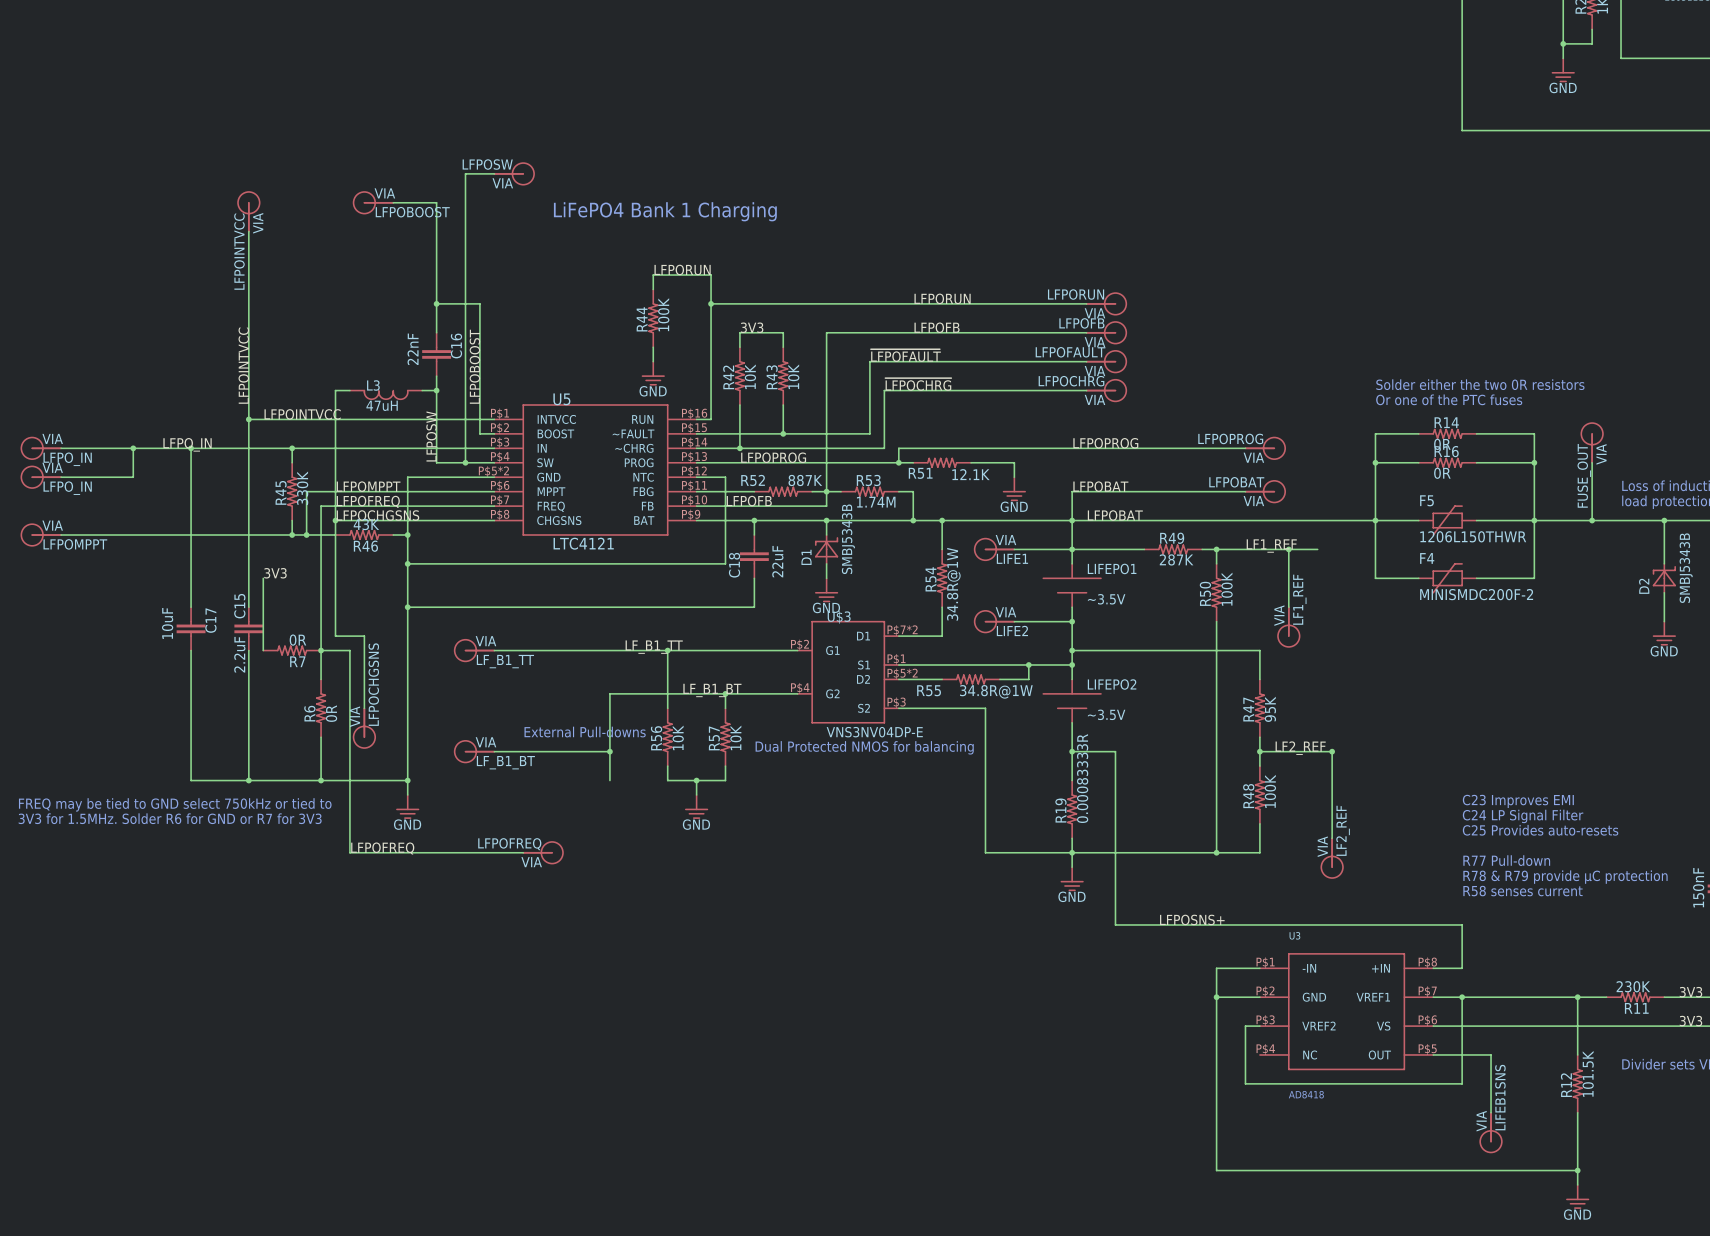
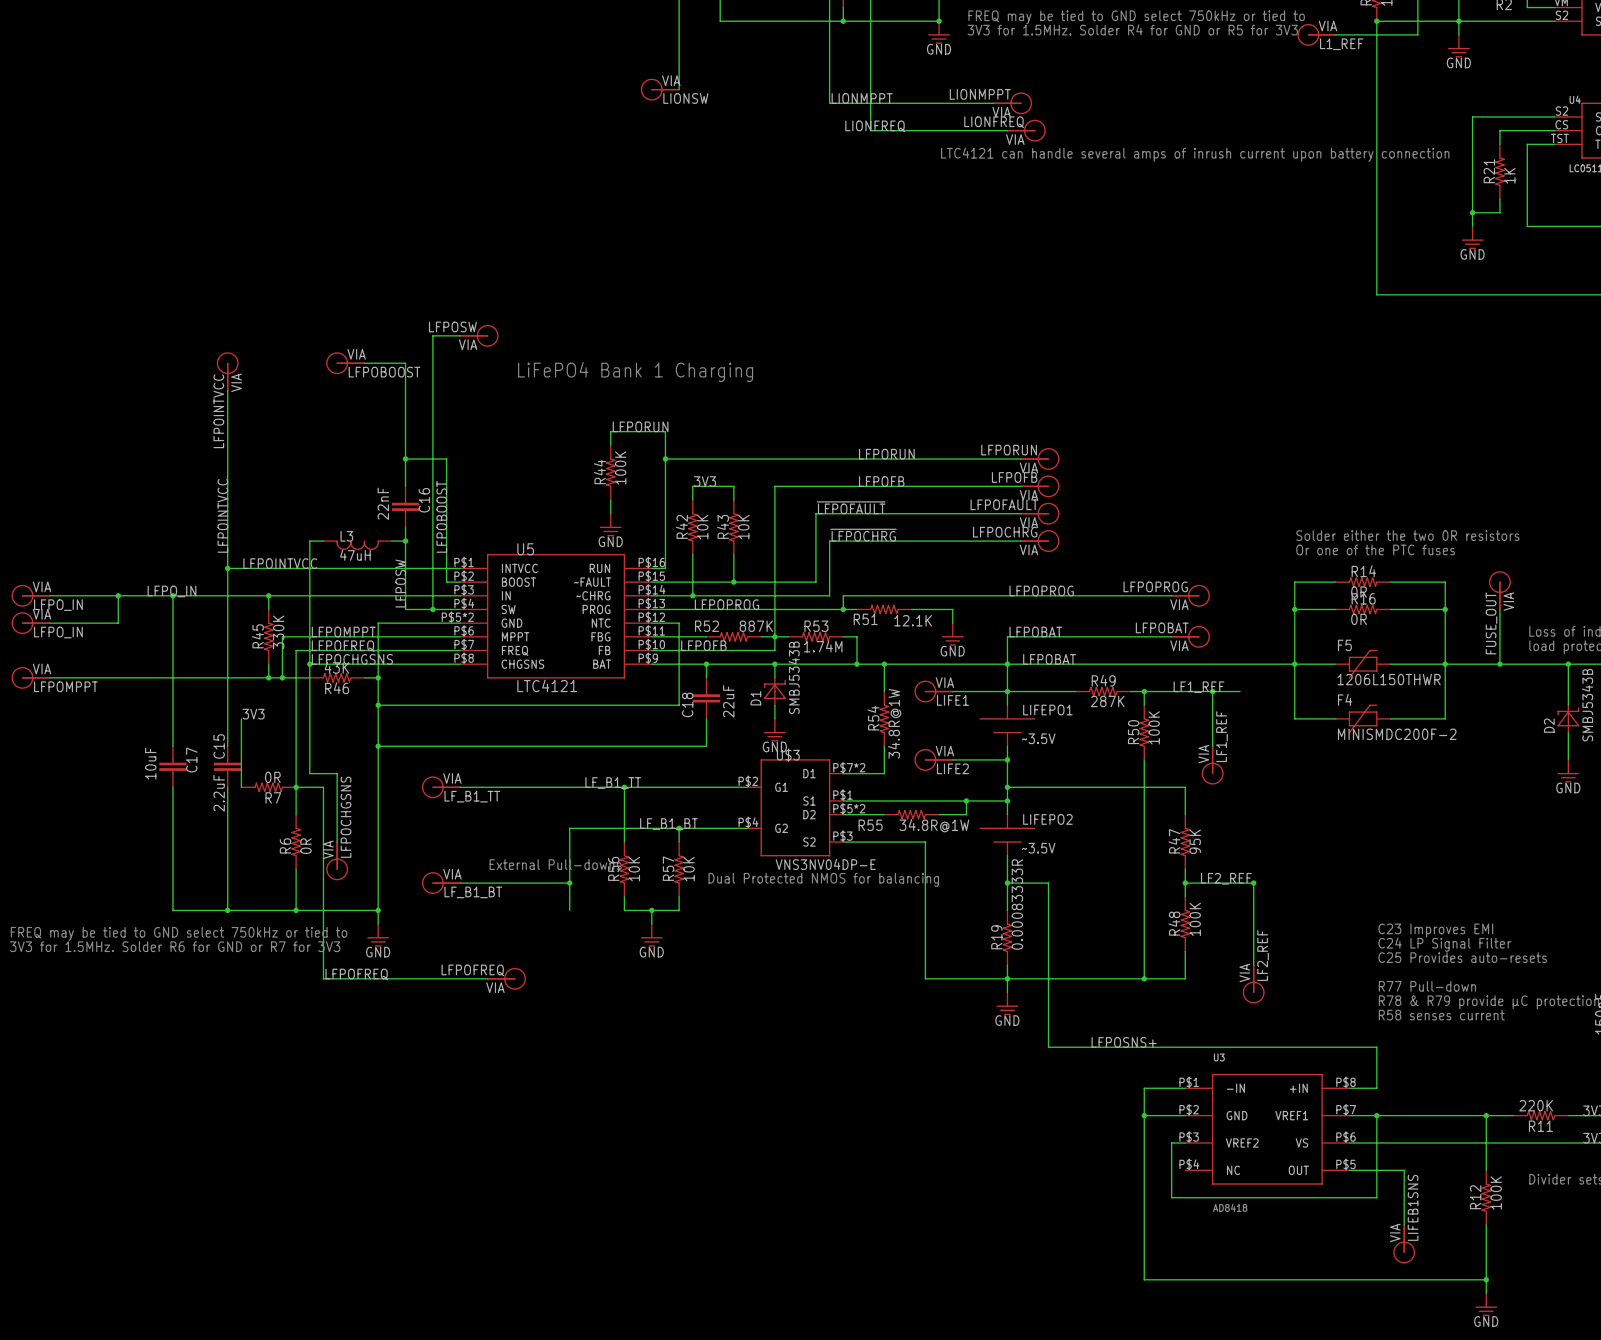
R11 value: 230K (1633, 986) -> 220K (1536, 1105)
R12 value: 101.5K (1588, 1073) -> 100K (1496, 1193)

